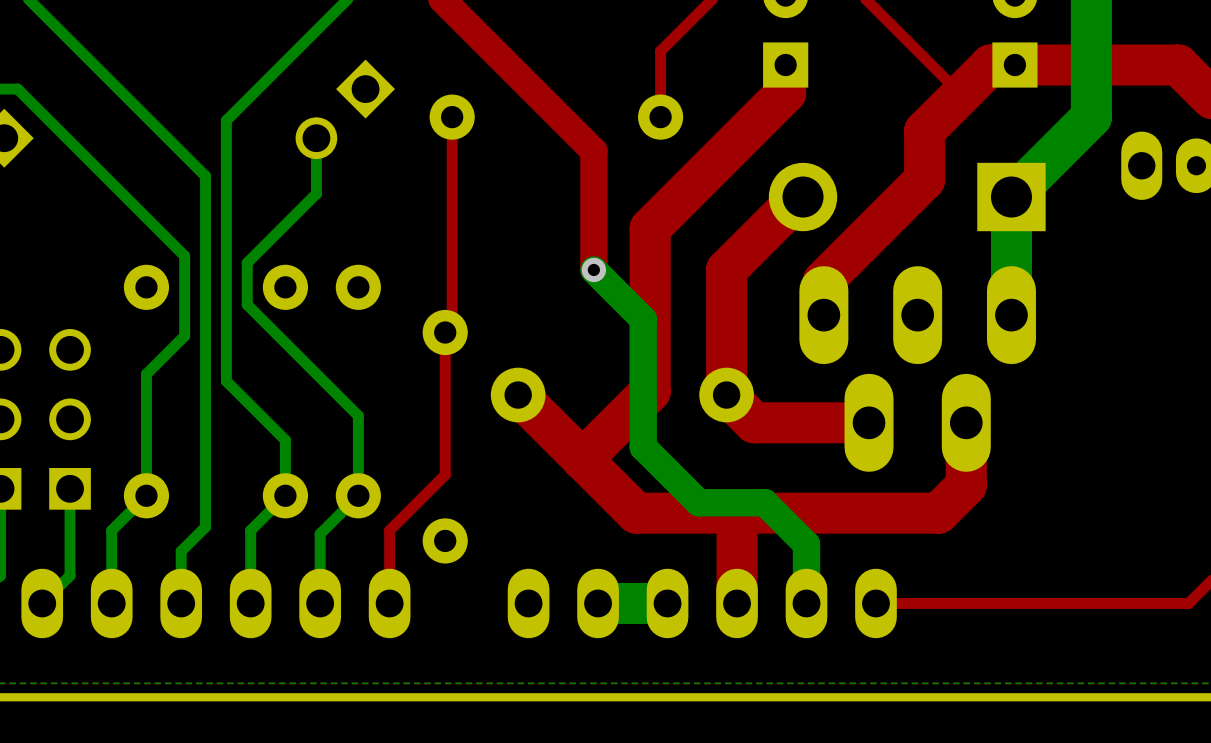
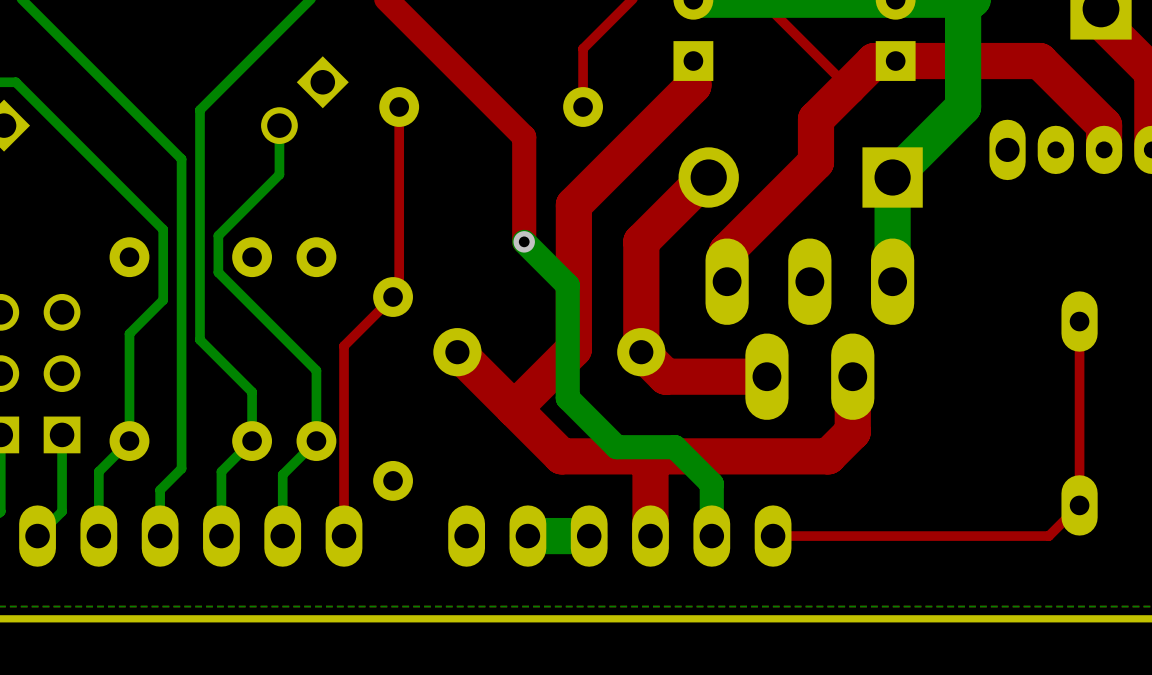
top track: (445, 332) (445, 474) (389, 530) -> (393, 297) (344, 346) (344, 471)

